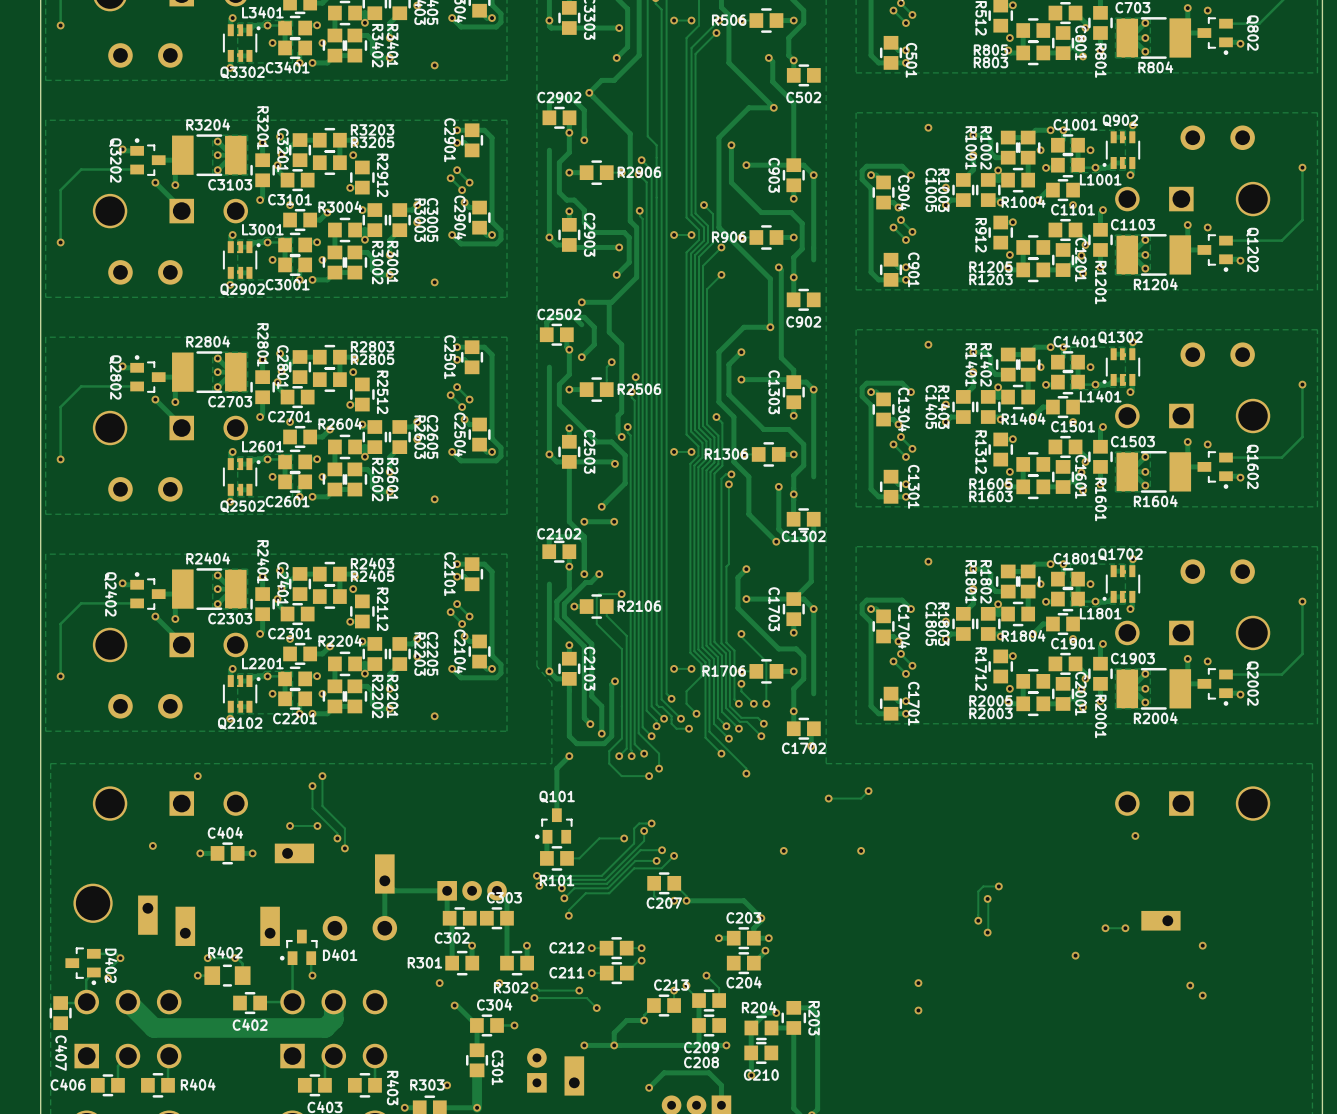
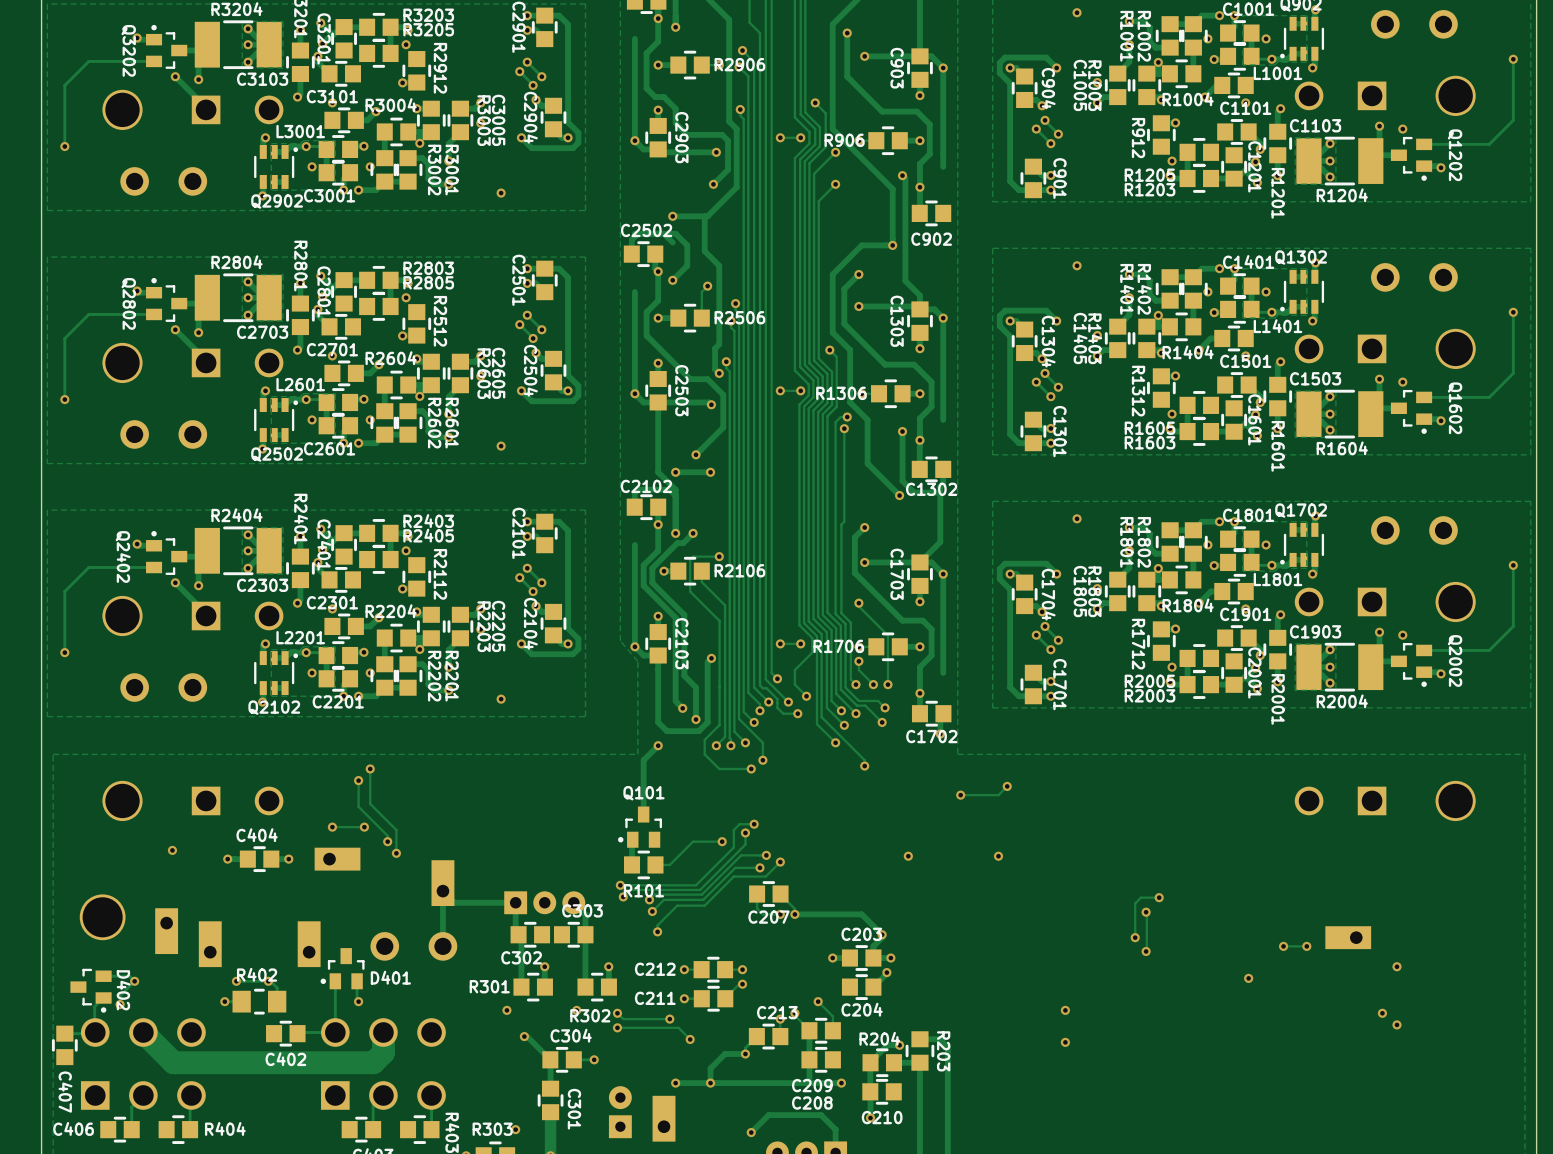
via: (197, 776) -> none
via: (1135, 835) -> none

